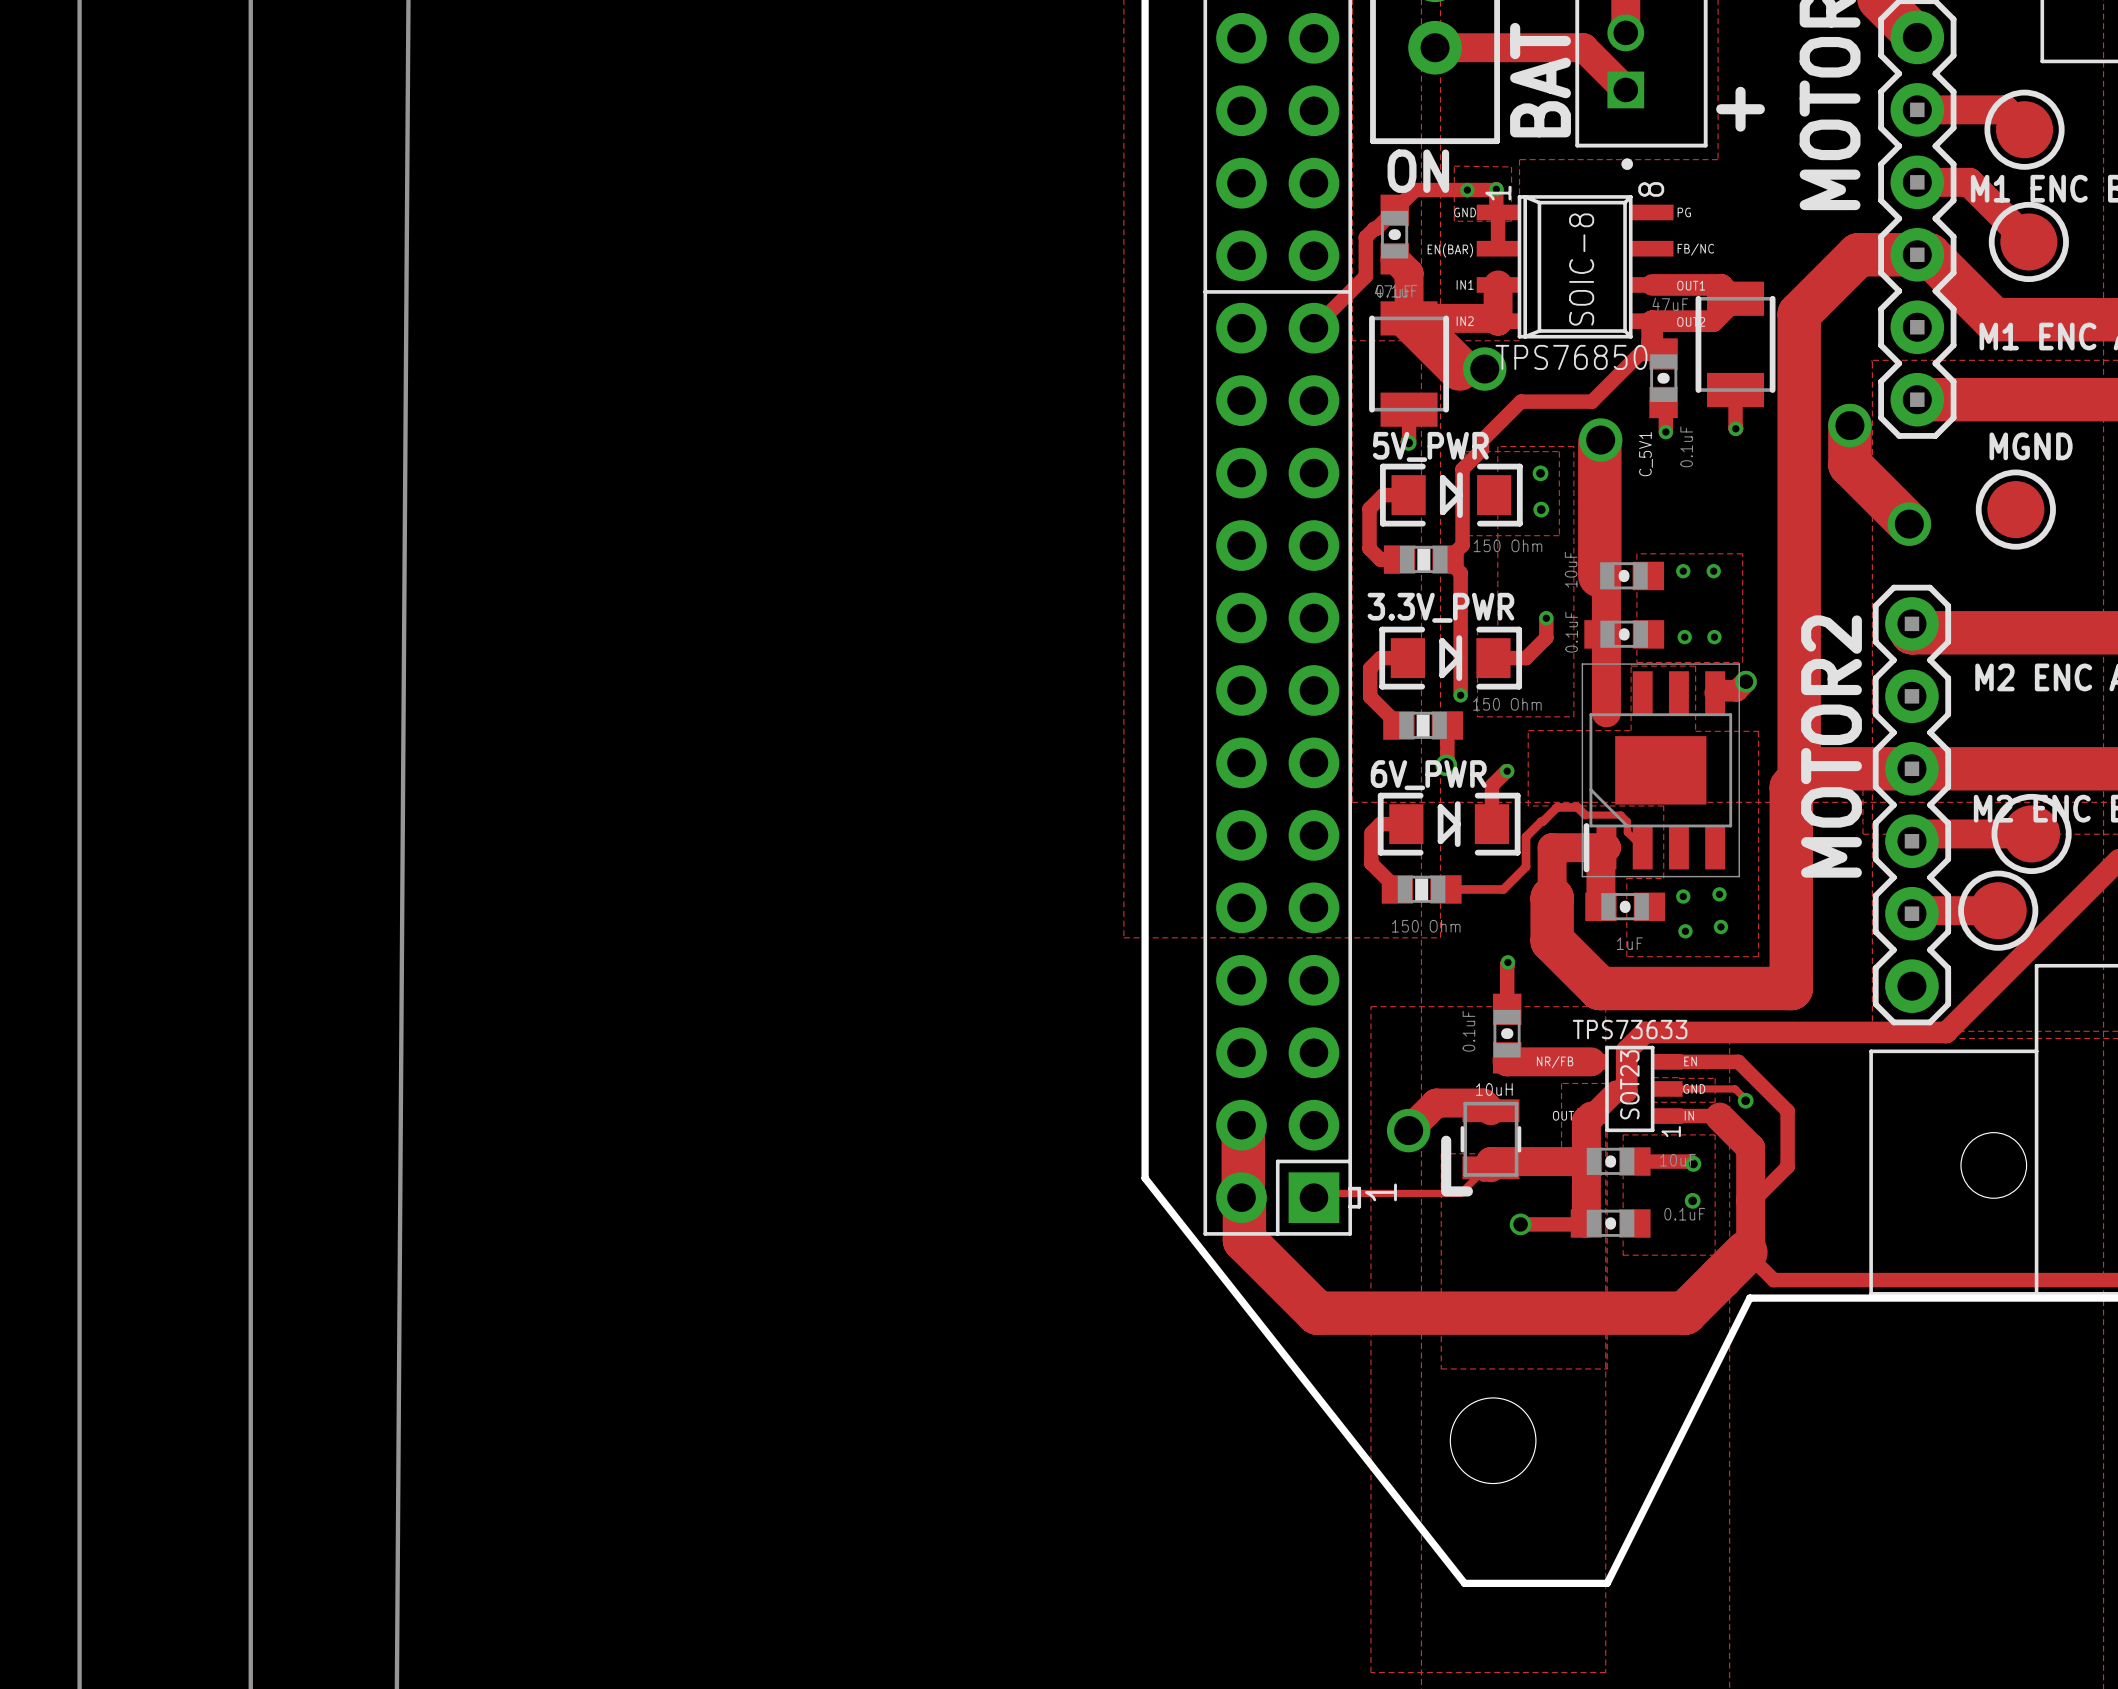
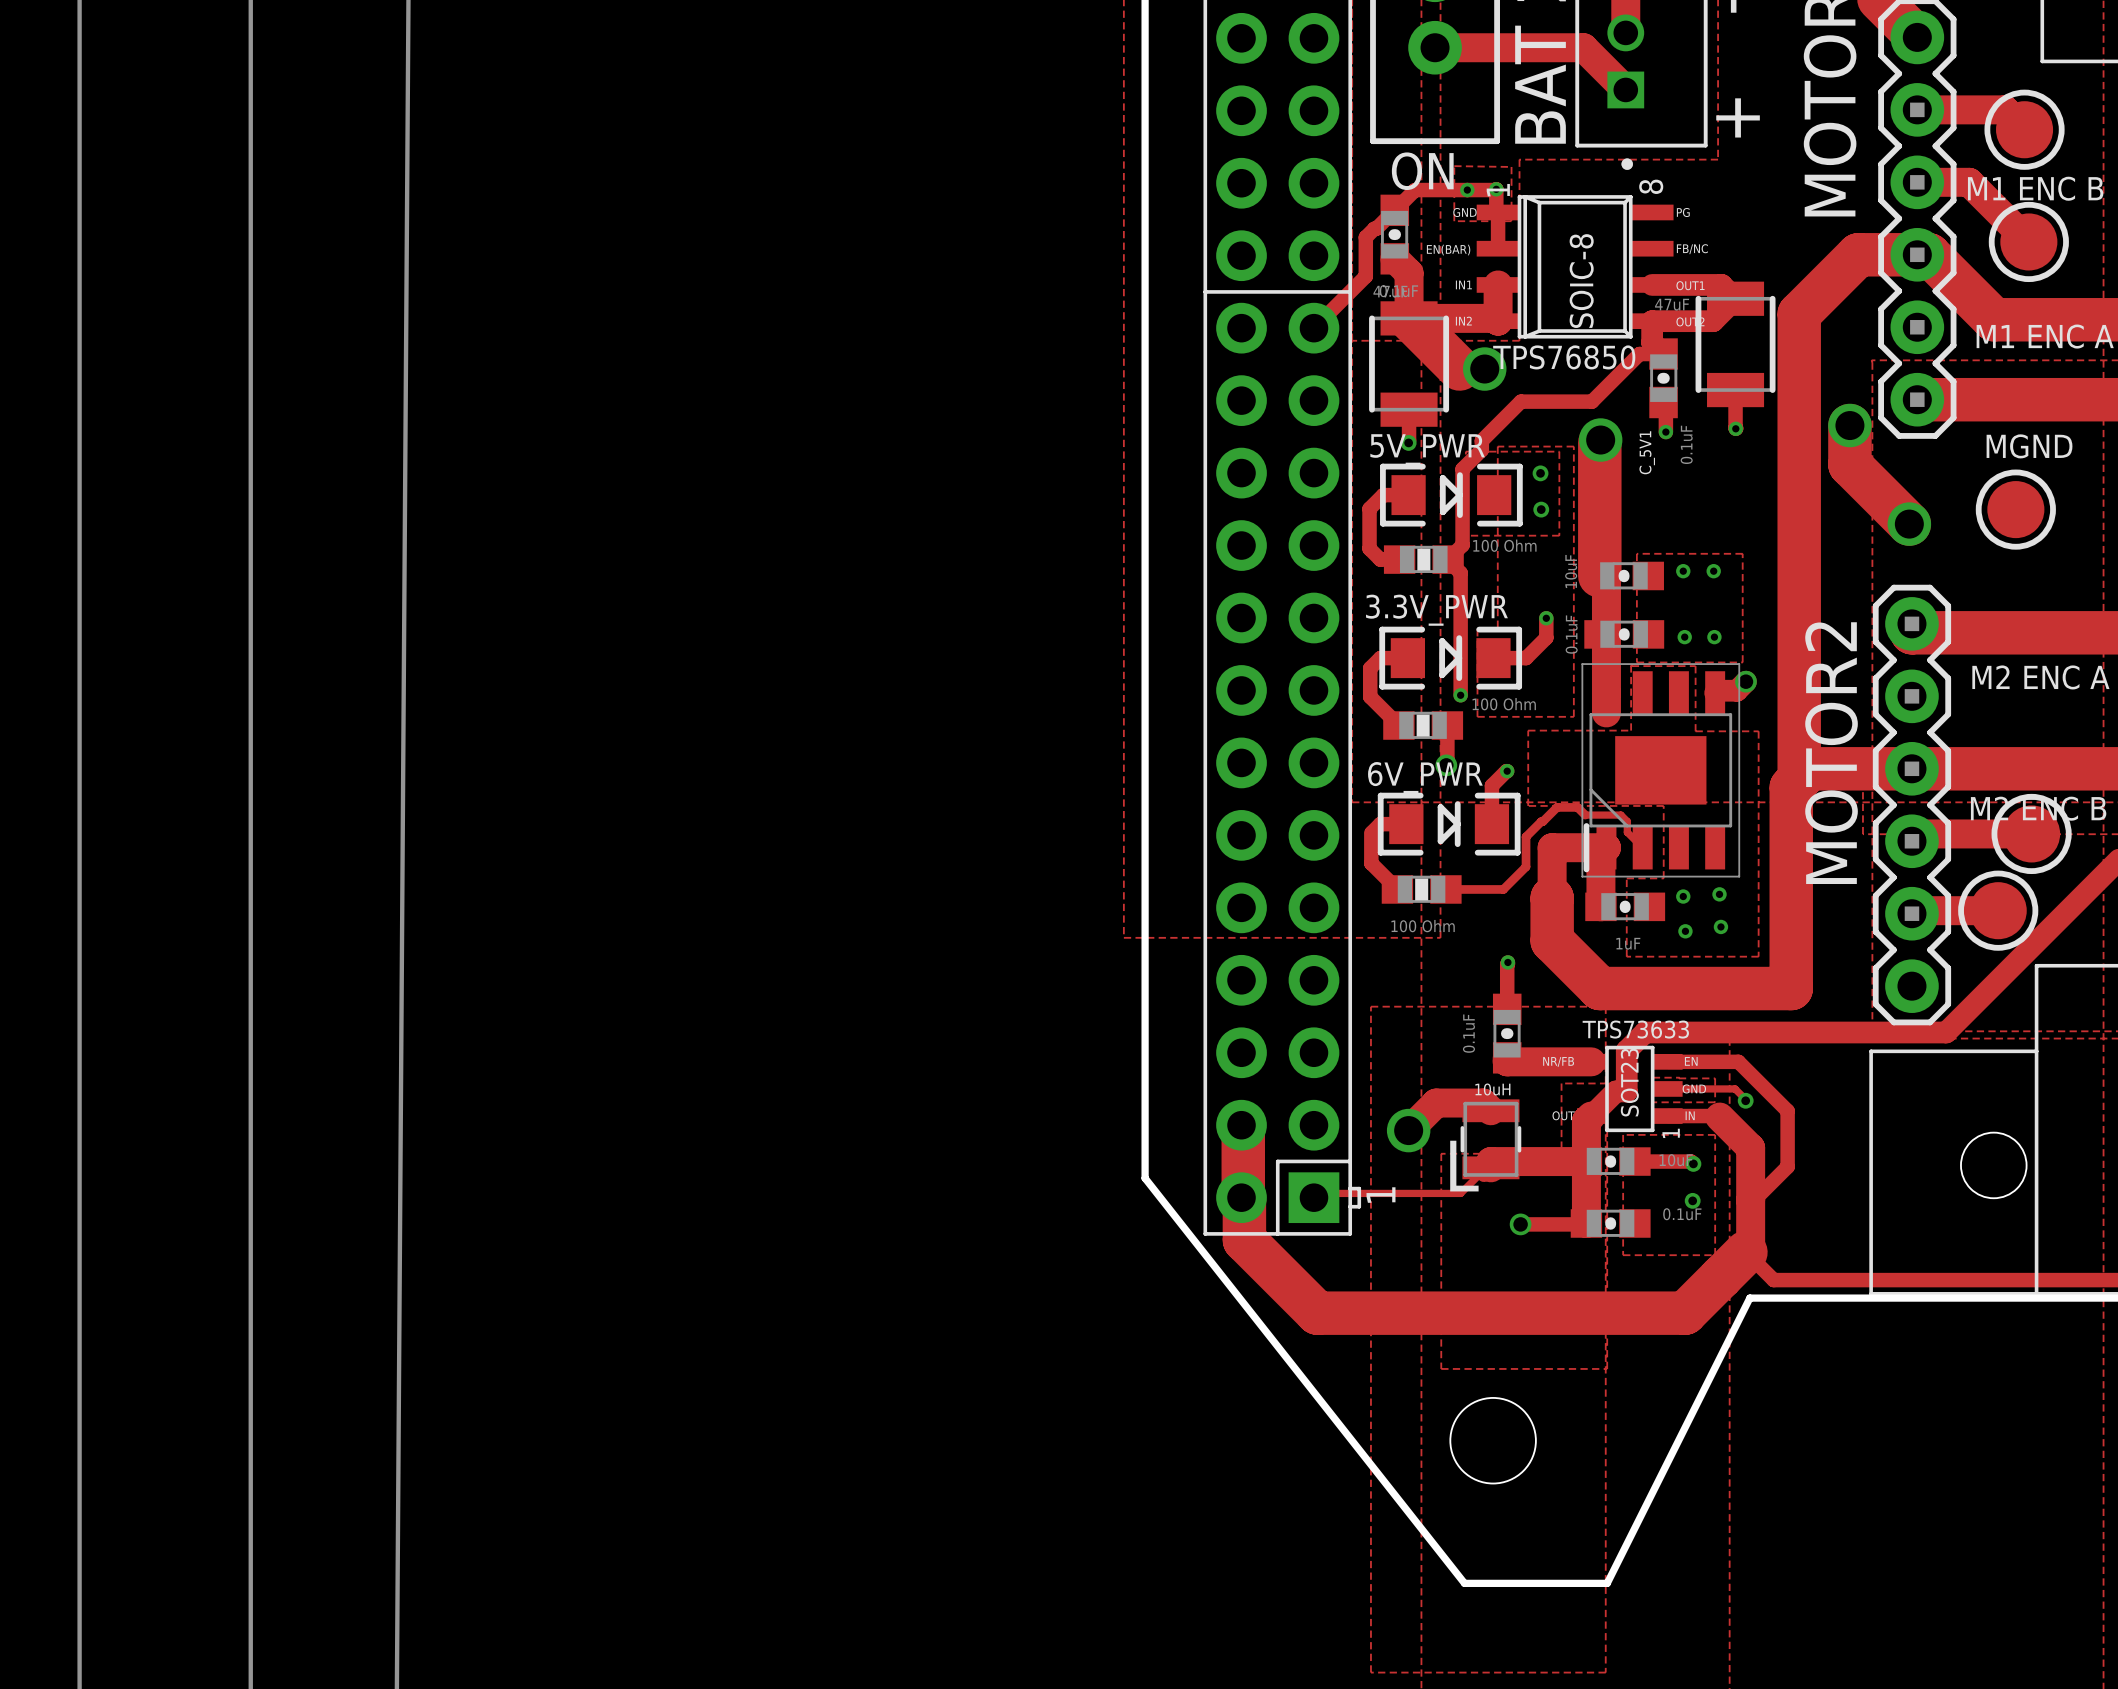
part value: 150 Ohm (1508, 545) -> 100 Ohm (1504, 545)
part value: 150 Ohm (1507, 704) -> 100 Ohm (1504, 704)
part value: 150 Ohm (1426, 926) -> 100 Ohm (1423, 926)

